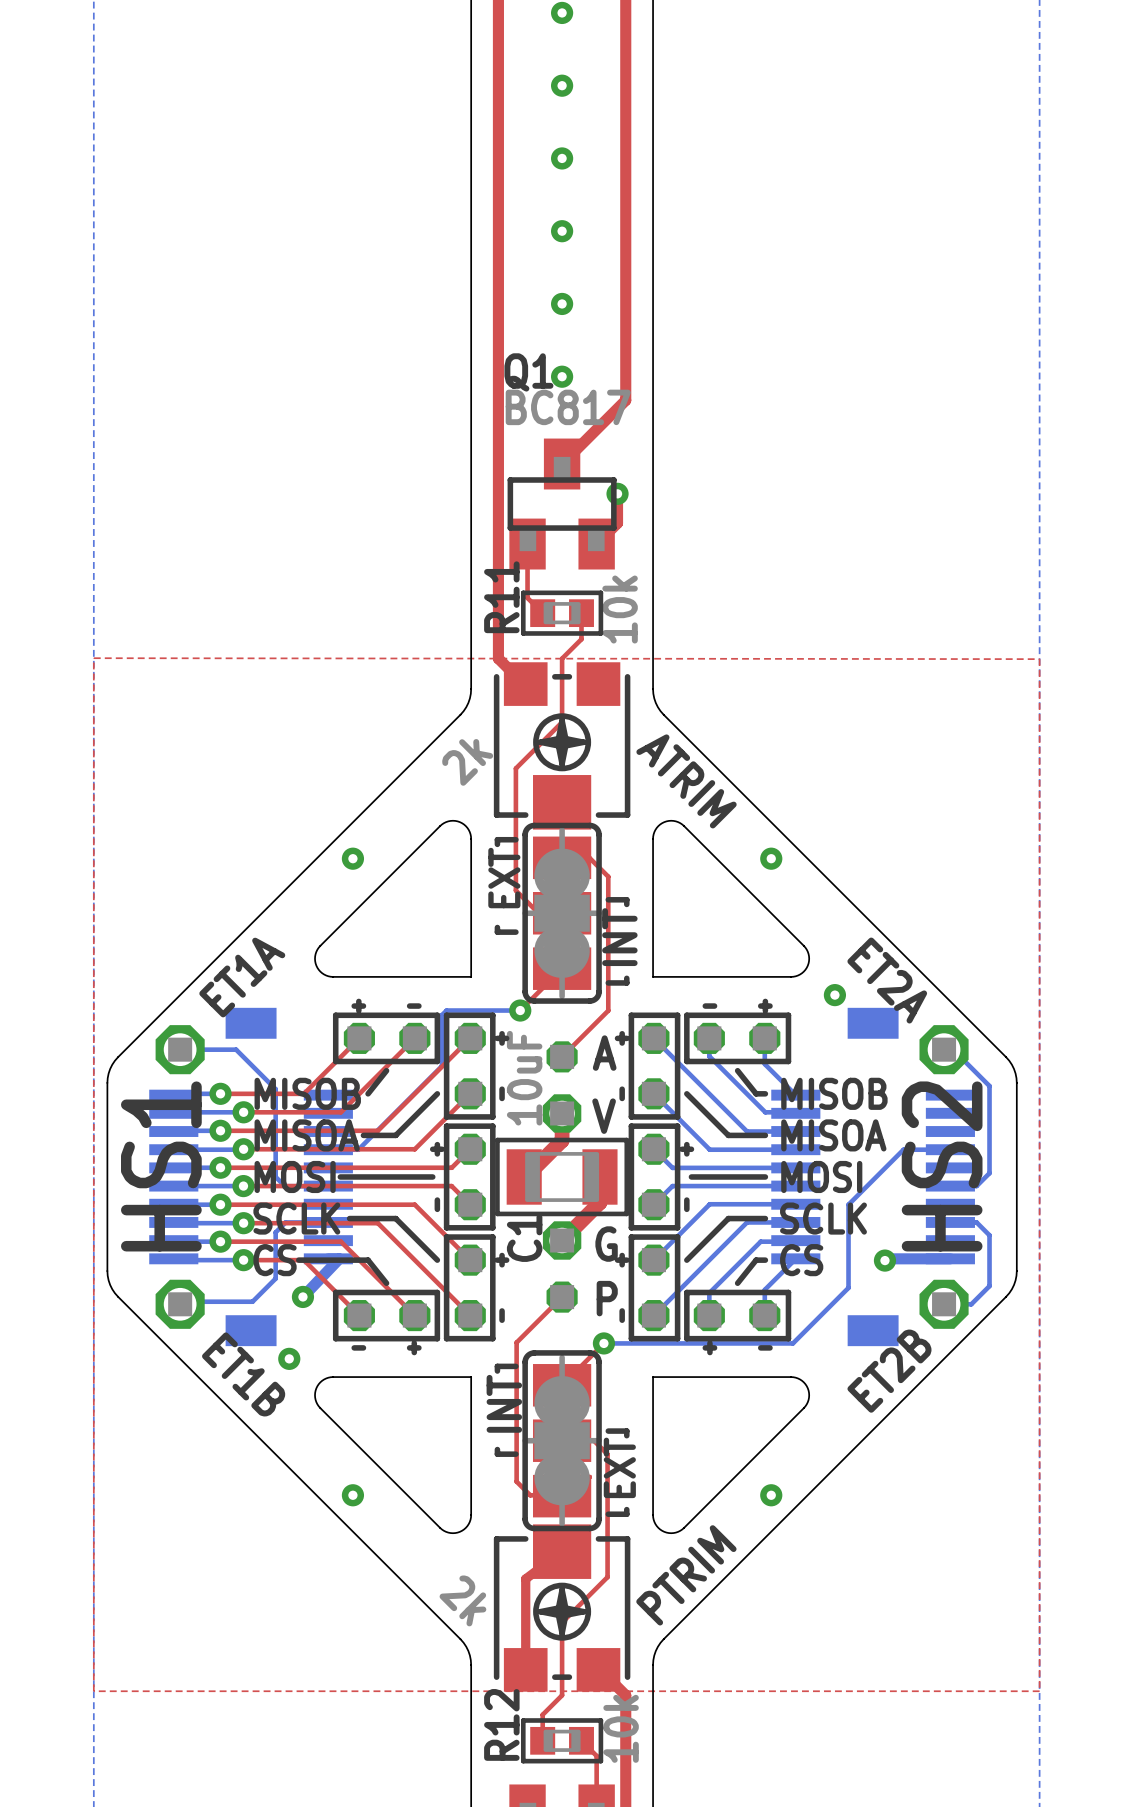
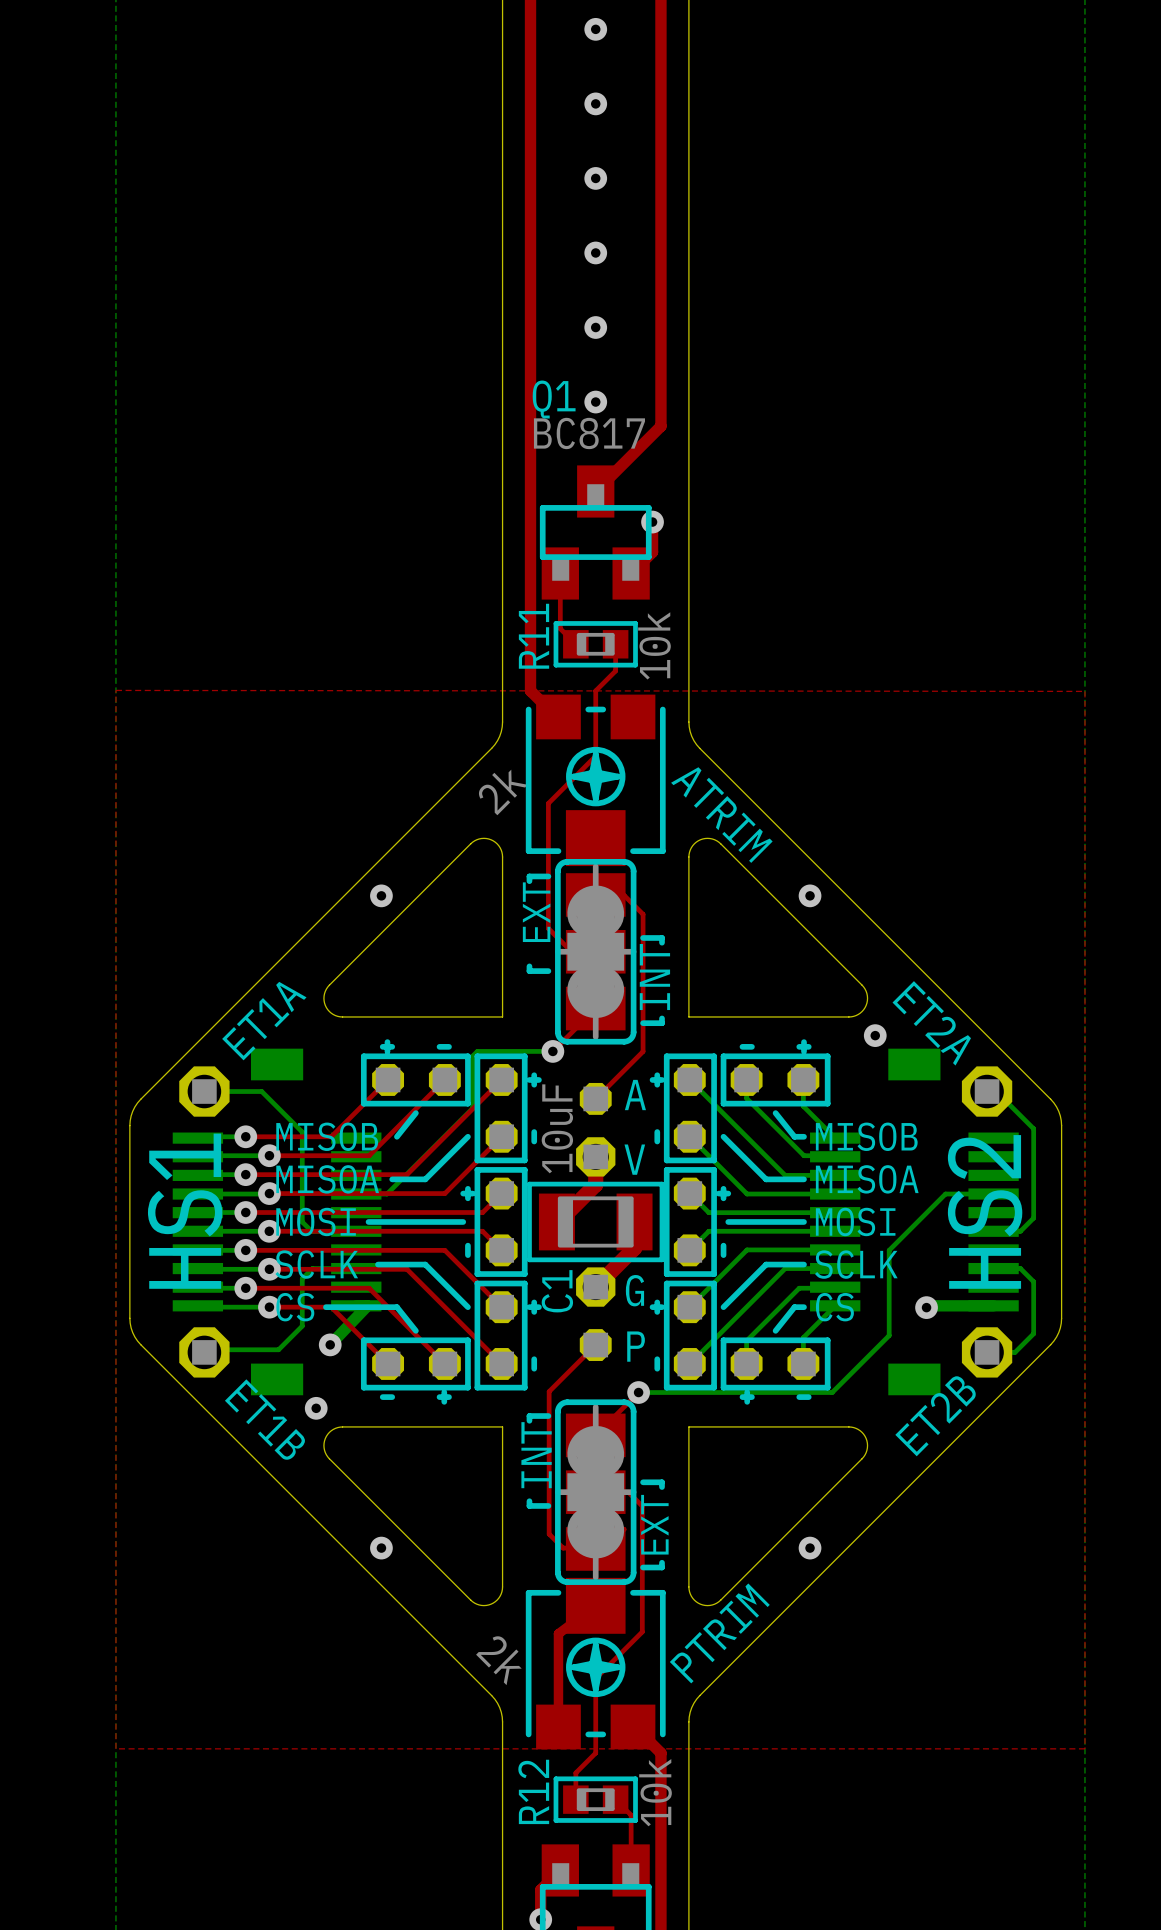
board edge: (471, 838) (467, 827) (459, 822) (448, 821) (440, 826) (318, 947) (315, 958) (317, 967) (324, 974) (333, 976) -> (502, 875) (502, 854) (497, 843) (483, 838) (470, 843) (326, 989) (324, 1003) (331, 1013) (340, 1016) (361, 1016)
board edge: (653, 838) (656, 827) (664, 822) (675, 821) (684, 826) (805, 947) (809, 958) (806, 967) (800, 974) (791, 976) -> (688, 875) (689, 854) (694, 843) (707, 838) (720, 843) (865, 989) (866, 1003) (860, 1013) (851, 1016) (830, 1016)
board edge: (333, 1377) (324, 1379) (317, 1386) (315, 1395) (318, 1406) (440, 1527) (448, 1532) (459, 1531) (467, 1526) (471, 1515) -> (361, 1426) (340, 1427) (331, 1430) (324, 1440) (326, 1454) (470, 1600) (483, 1605) (497, 1600) (502, 1589) (502, 1568)
board edge: (791, 1377) (800, 1379) (806, 1386) (809, 1395) (805, 1406) (684, 1527) (675, 1532) (664, 1531) (656, 1526) (653, 1515) -> (830, 1426) (851, 1427) (860, 1430) (866, 1440) (865, 1454) (720, 1600) (707, 1605) (694, 1600) (689, 1589) (688, 1568)

